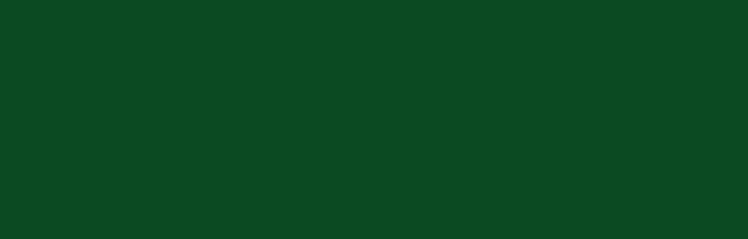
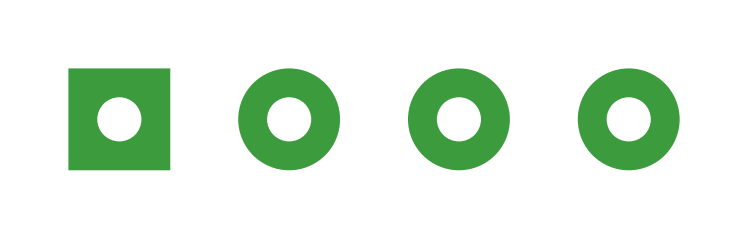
part: none -> (374, 119)

